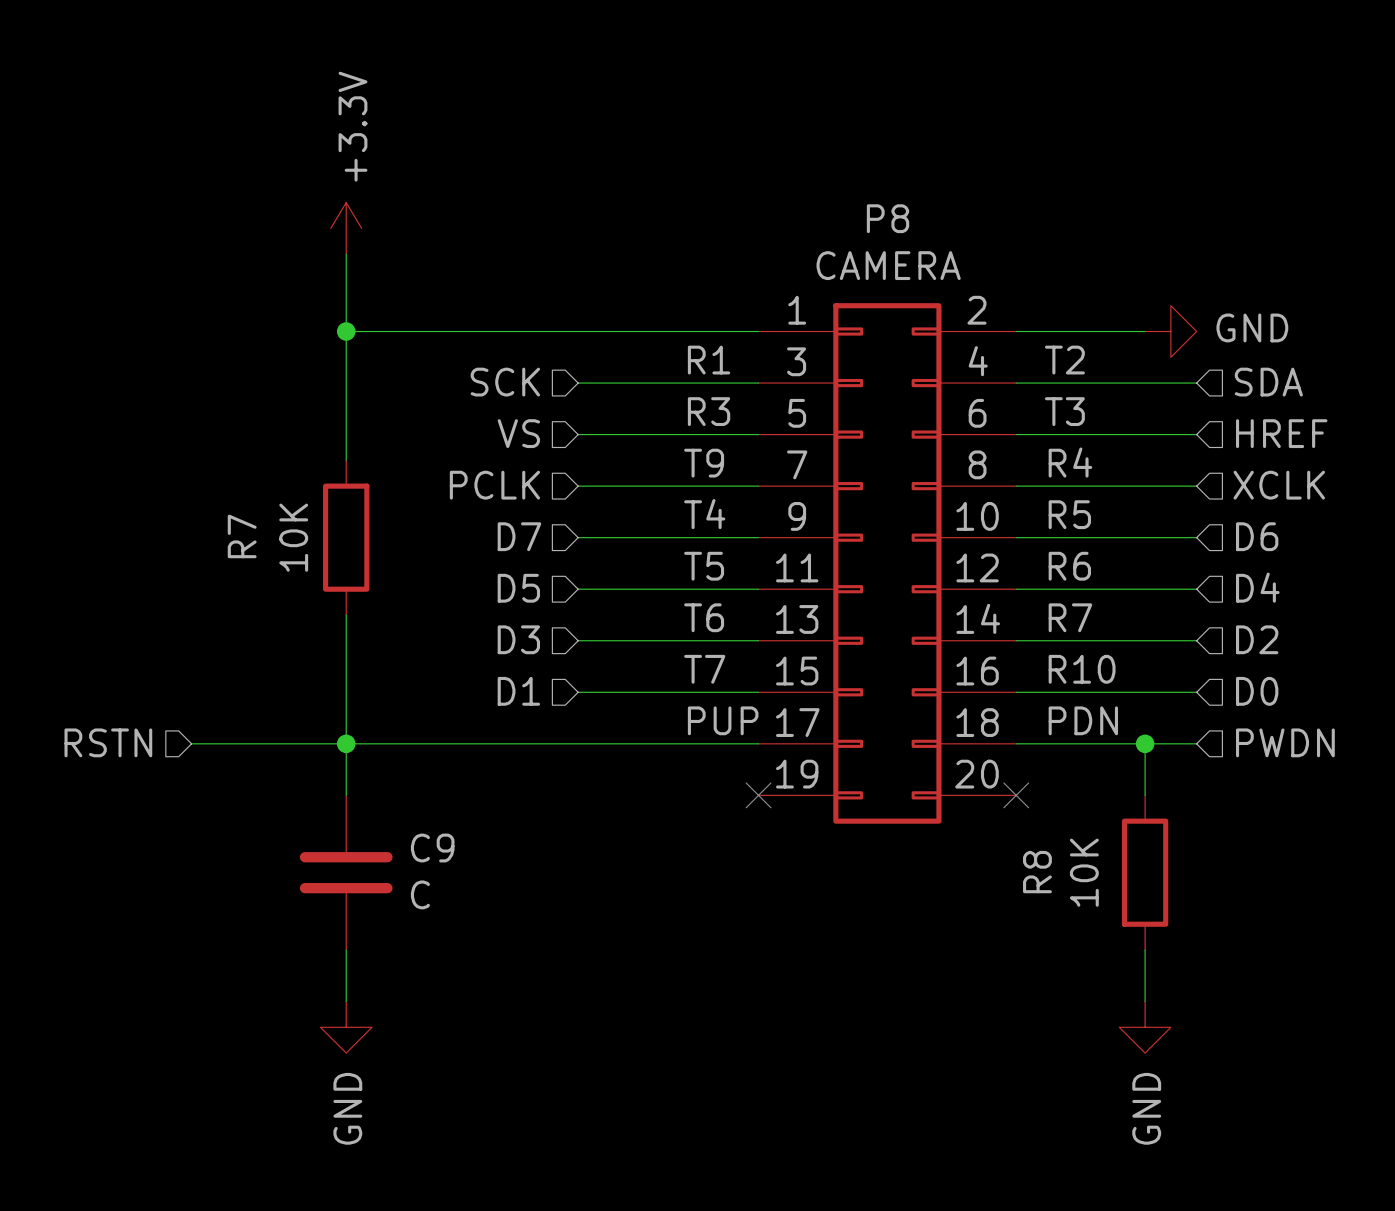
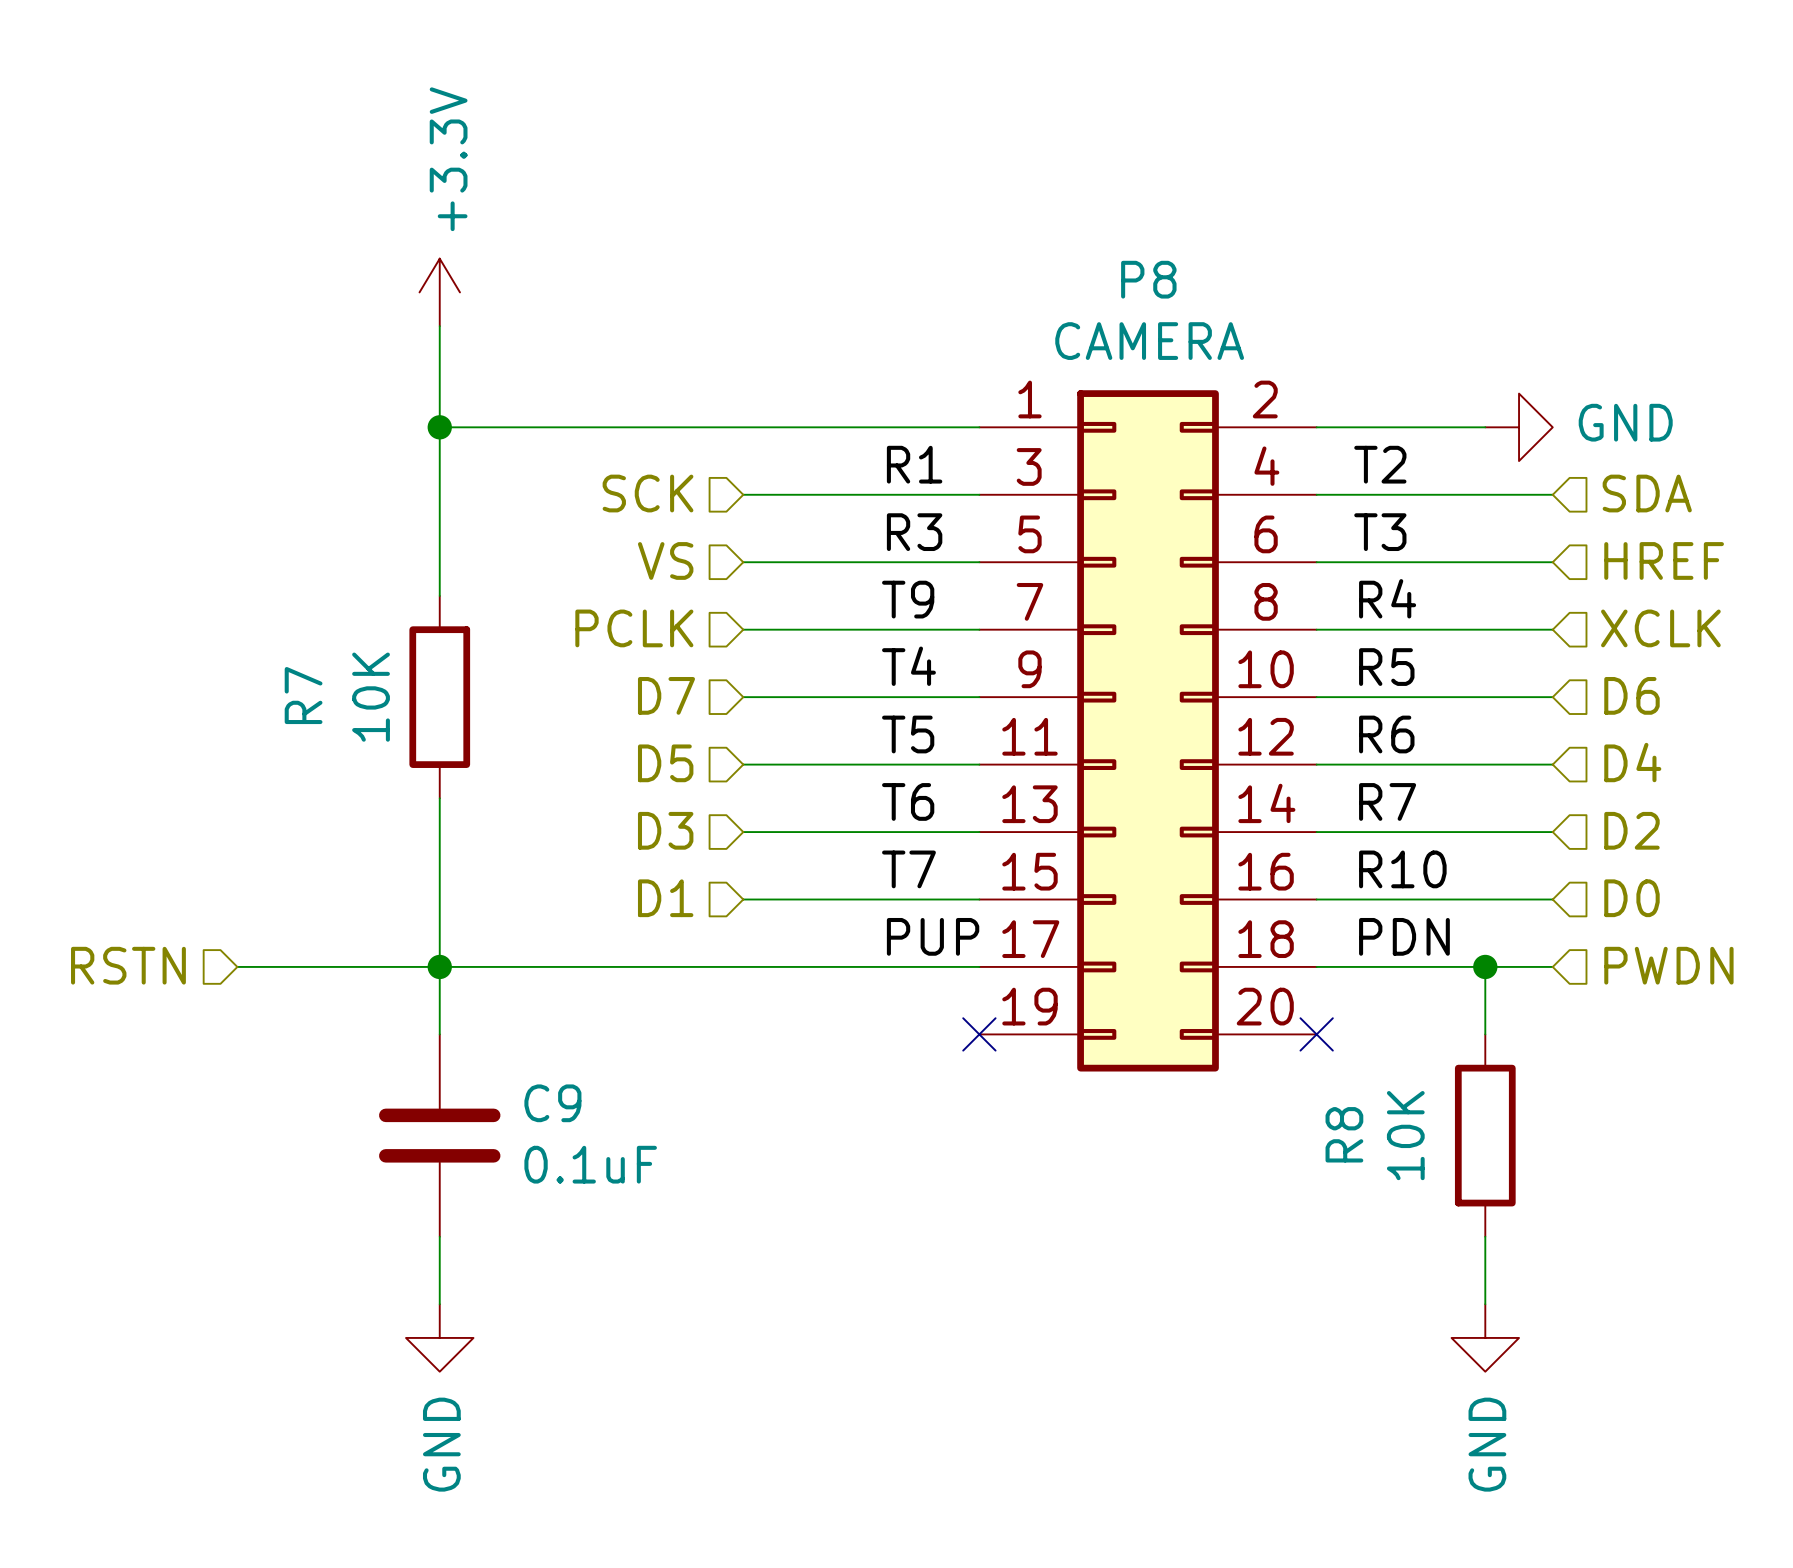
C9 value: C (420, 894) -> 0.1uF (590, 1164)

